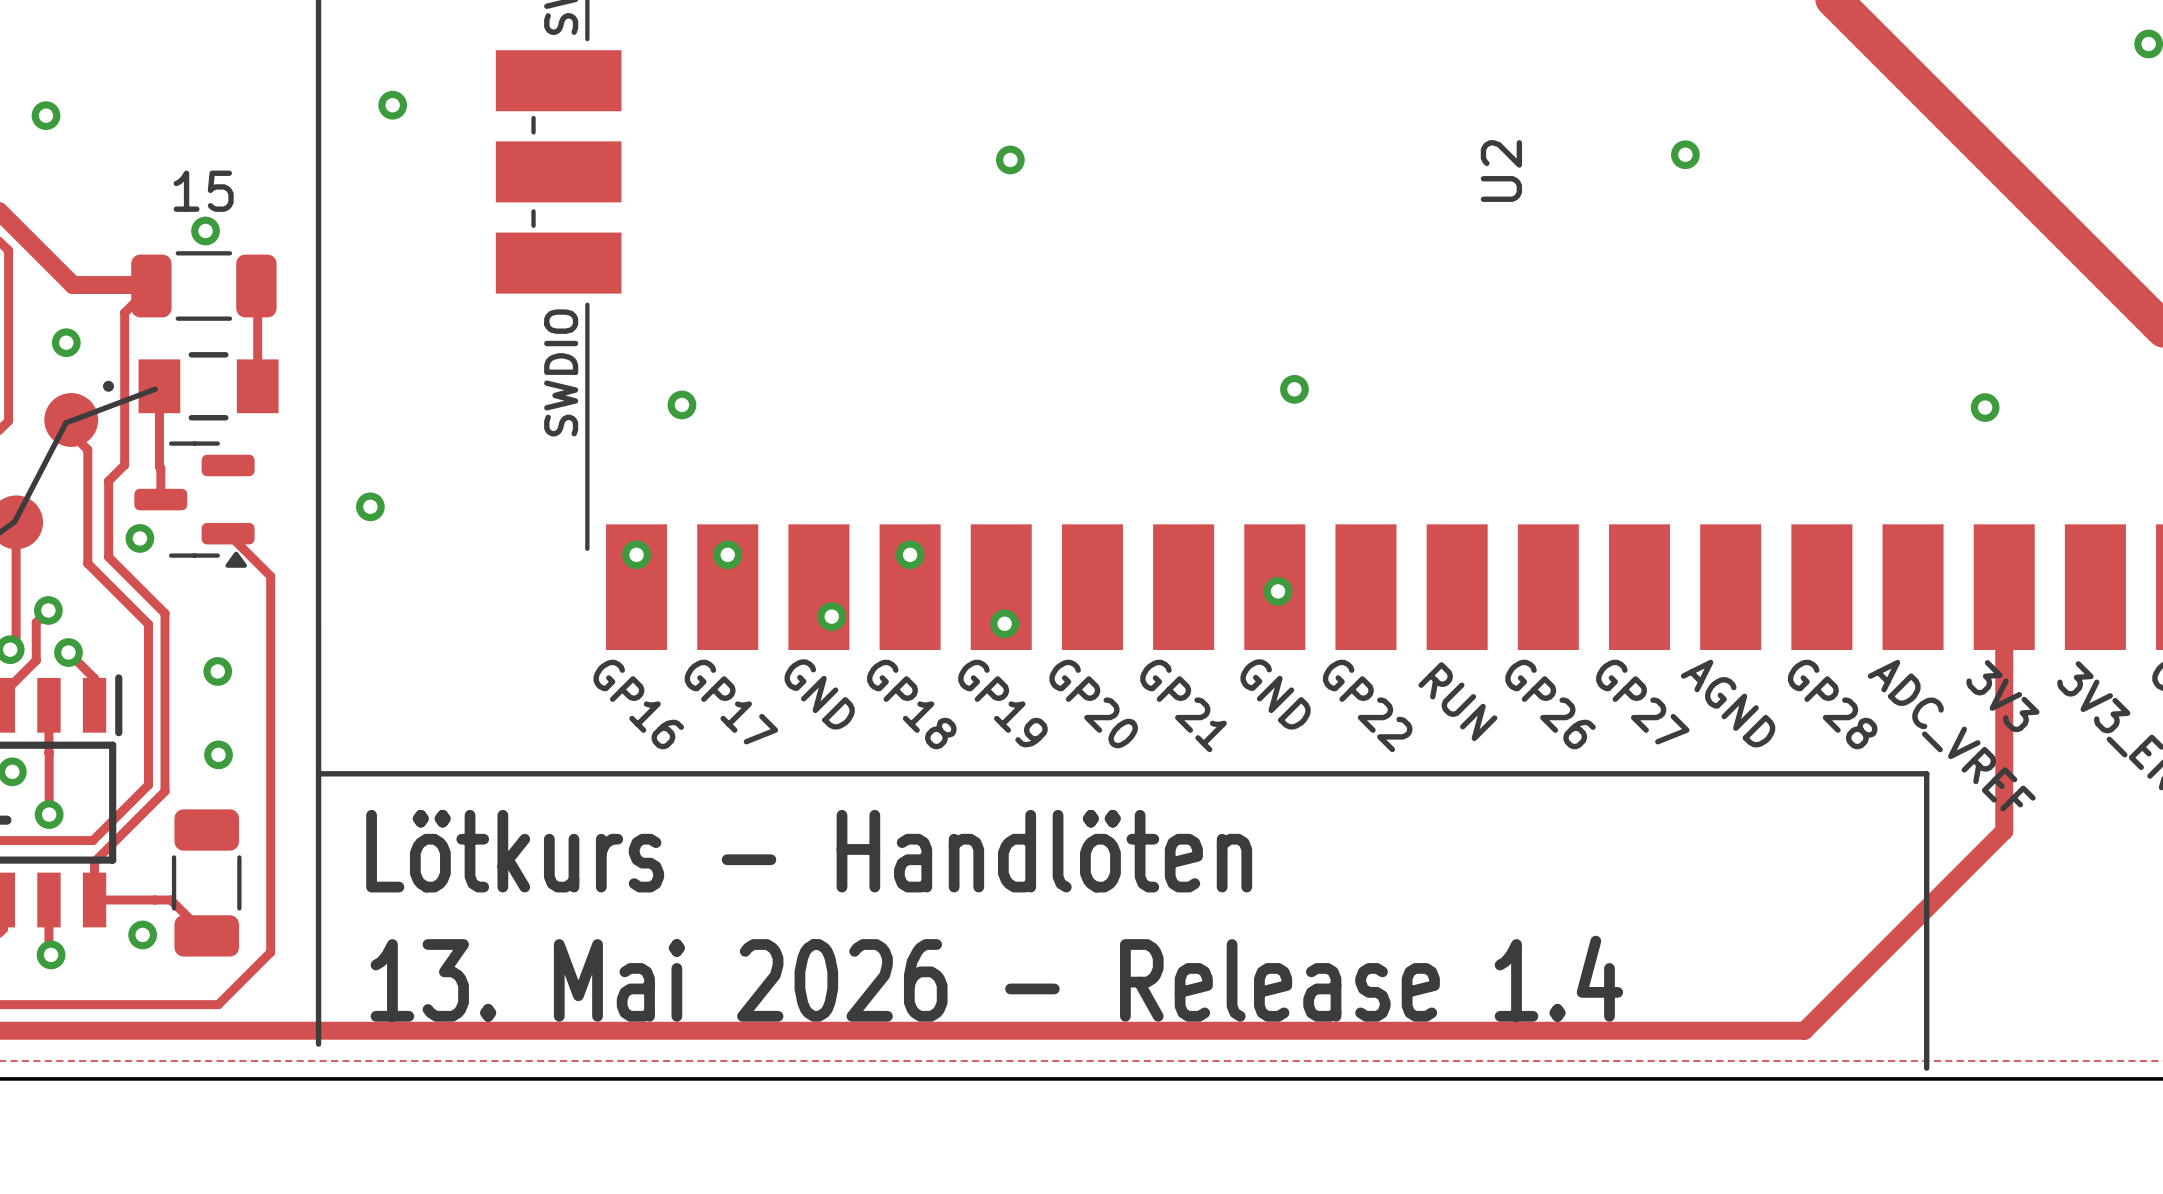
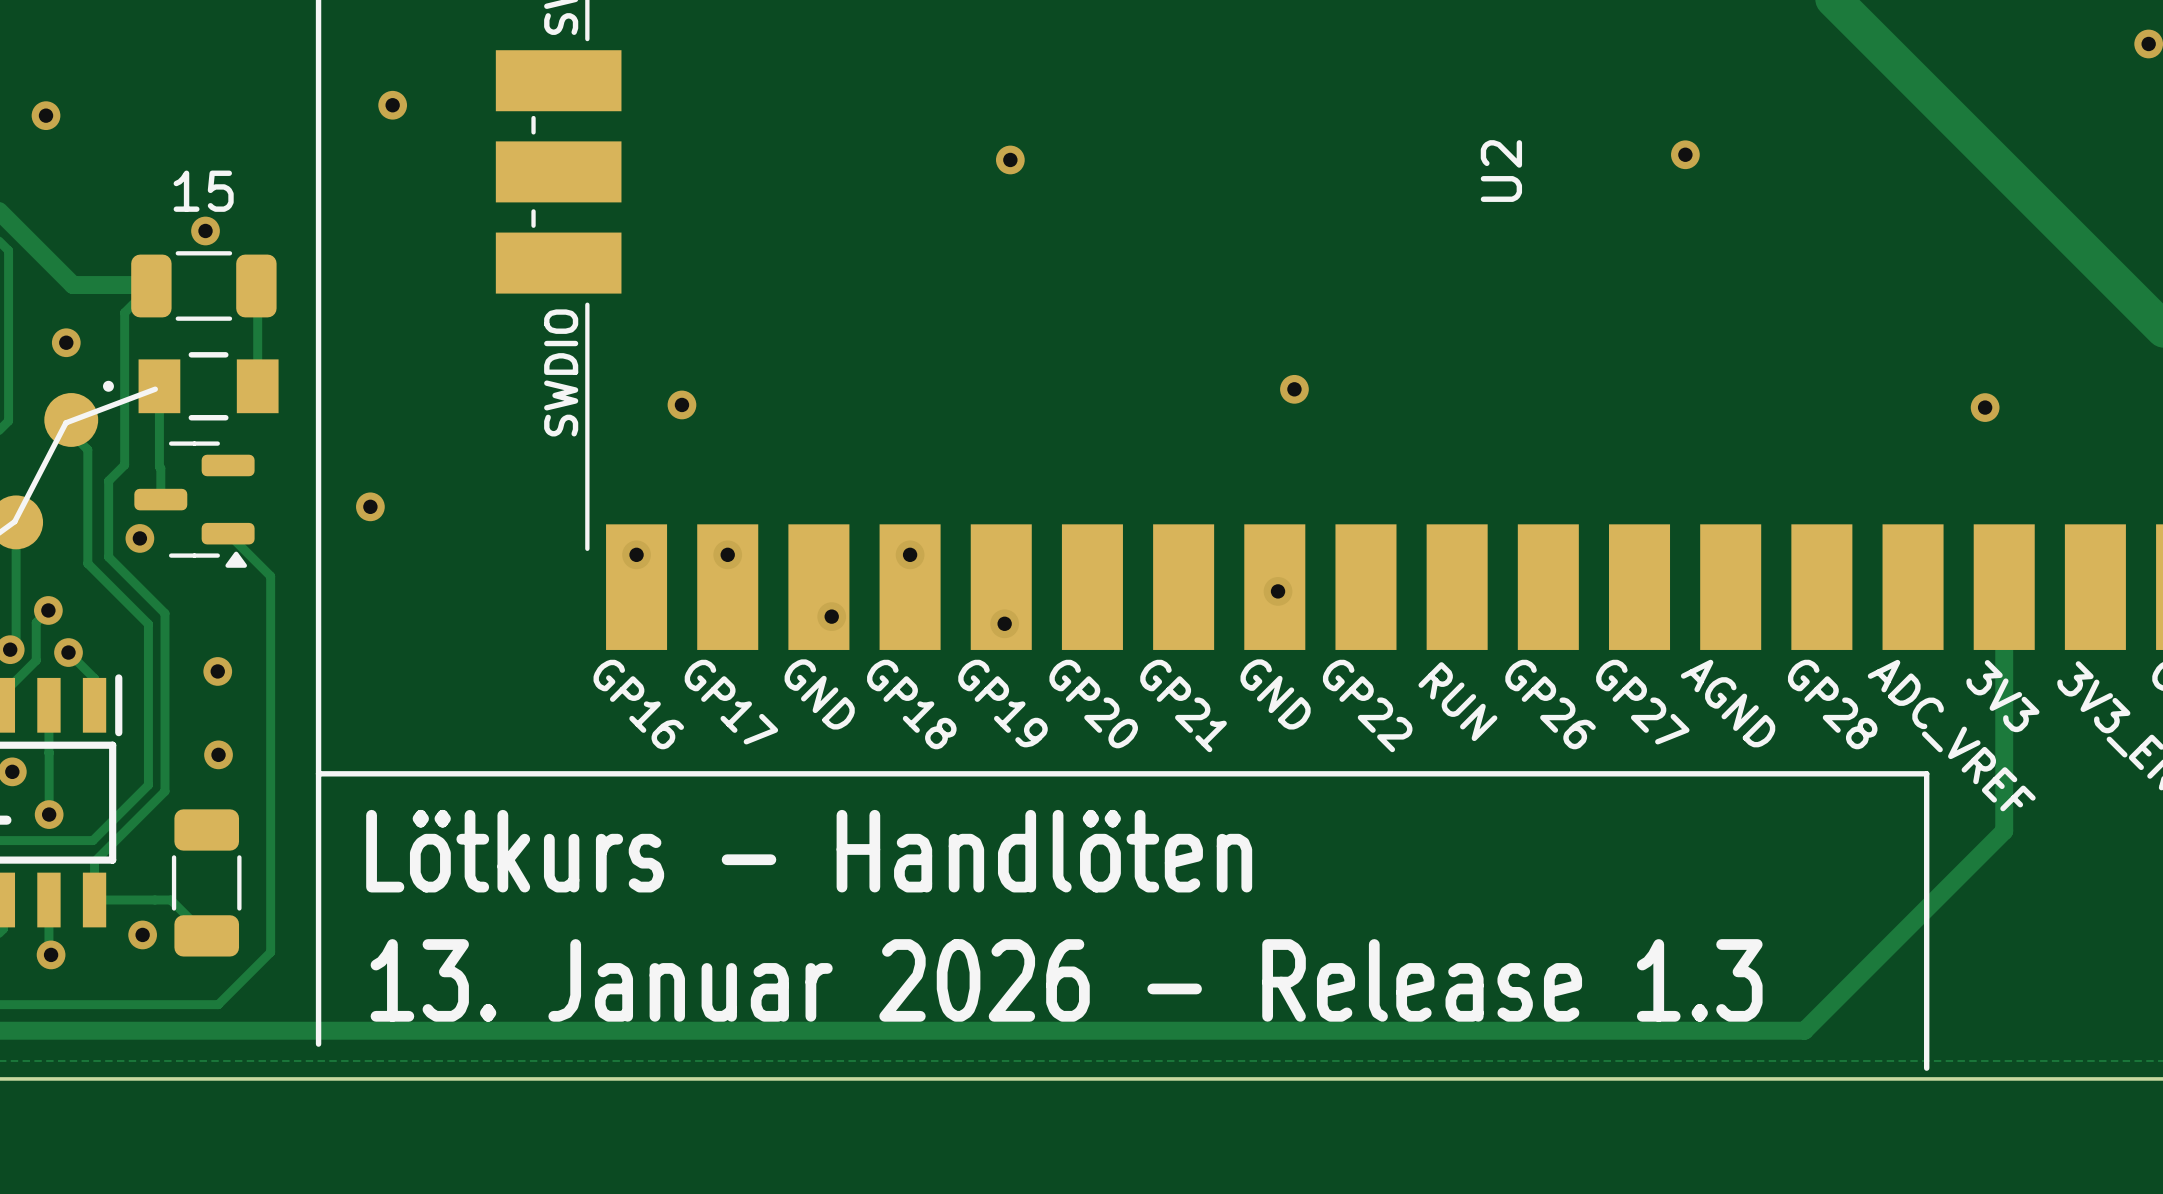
text: 13. Mai 2026 - Release 1.4 (996, 978) -> 13. Januar 2026 - Release 1.3 (1066, 980)

